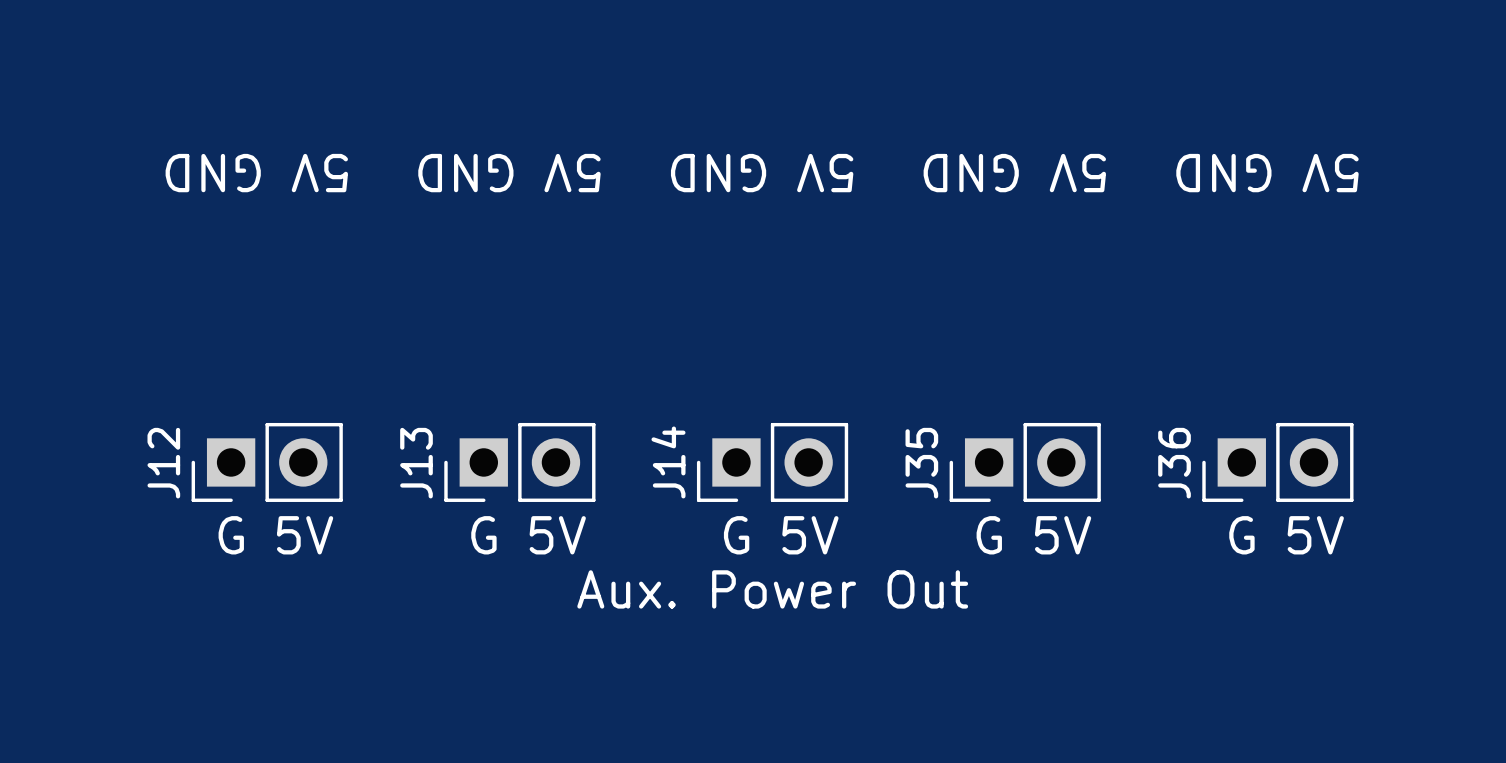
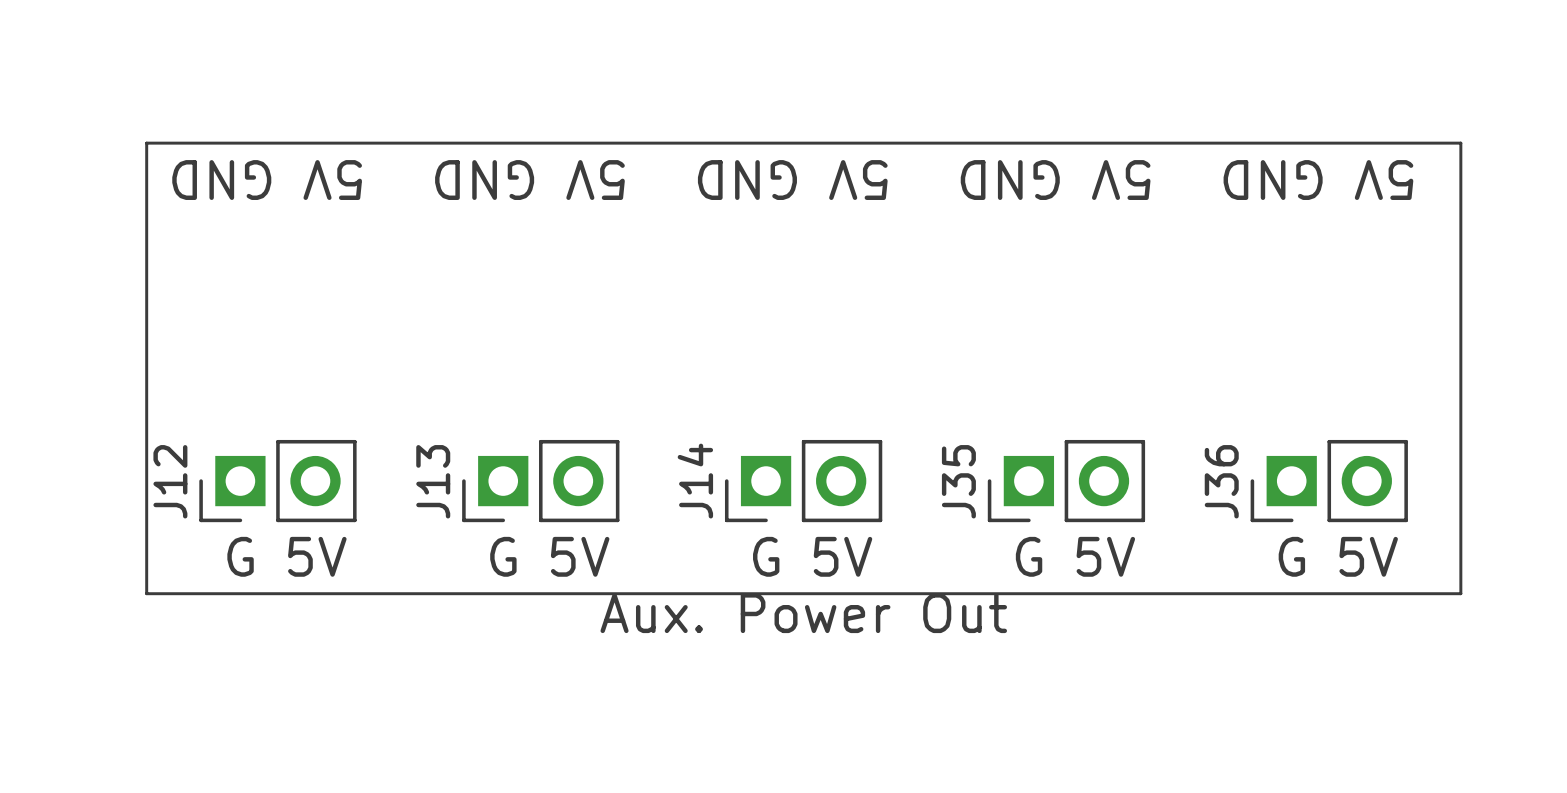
line: none -> (146, 143) (1460, 143) (1460, 593) (146, 593) (146, 143)

